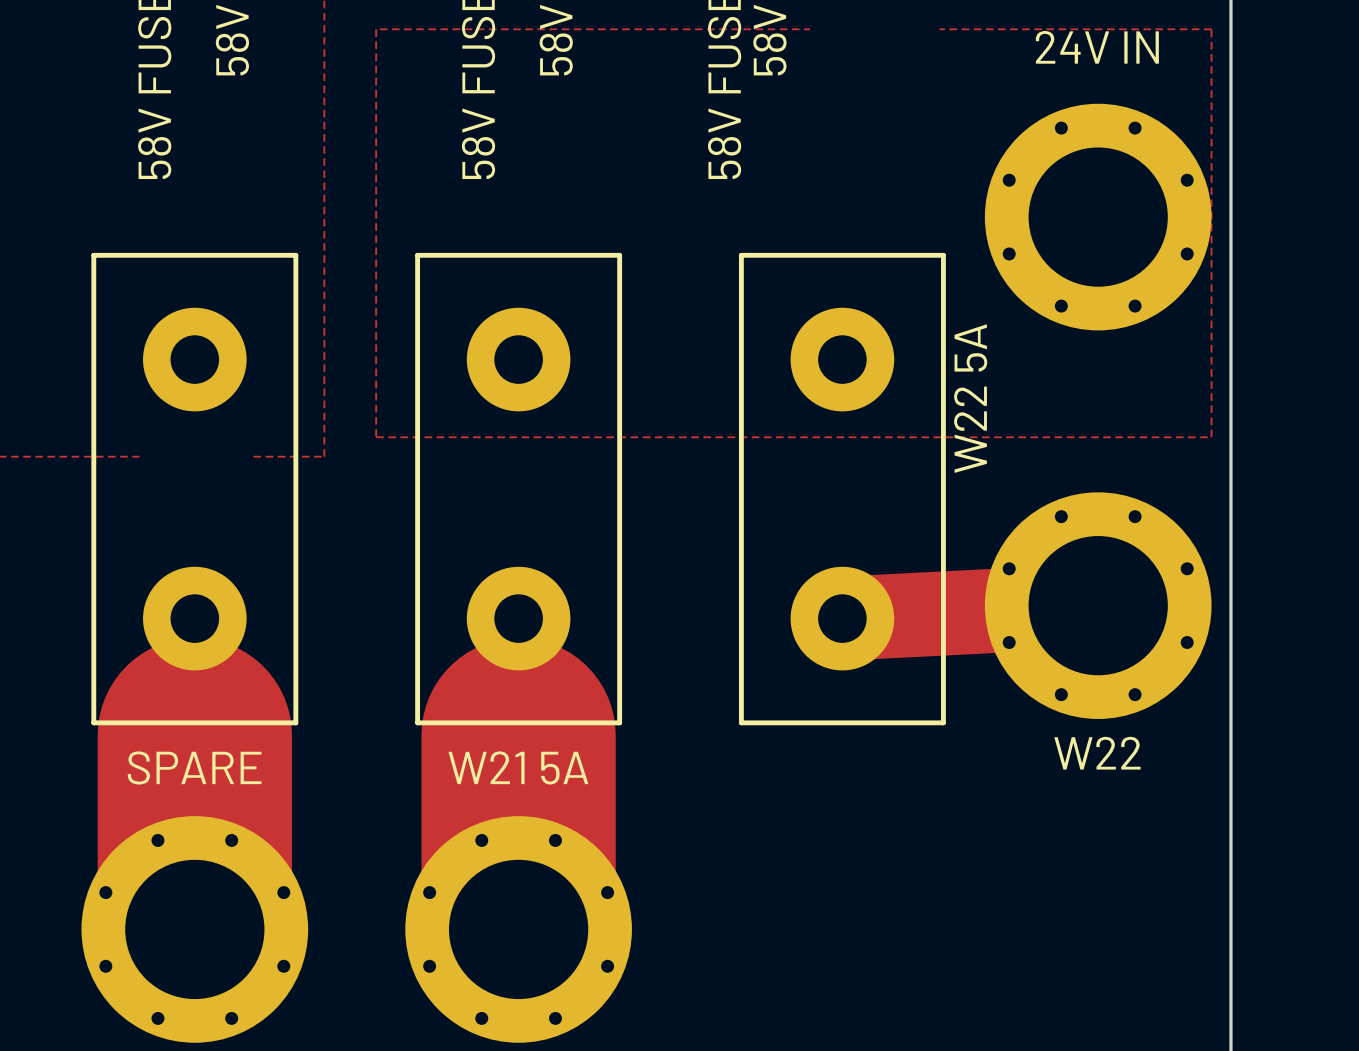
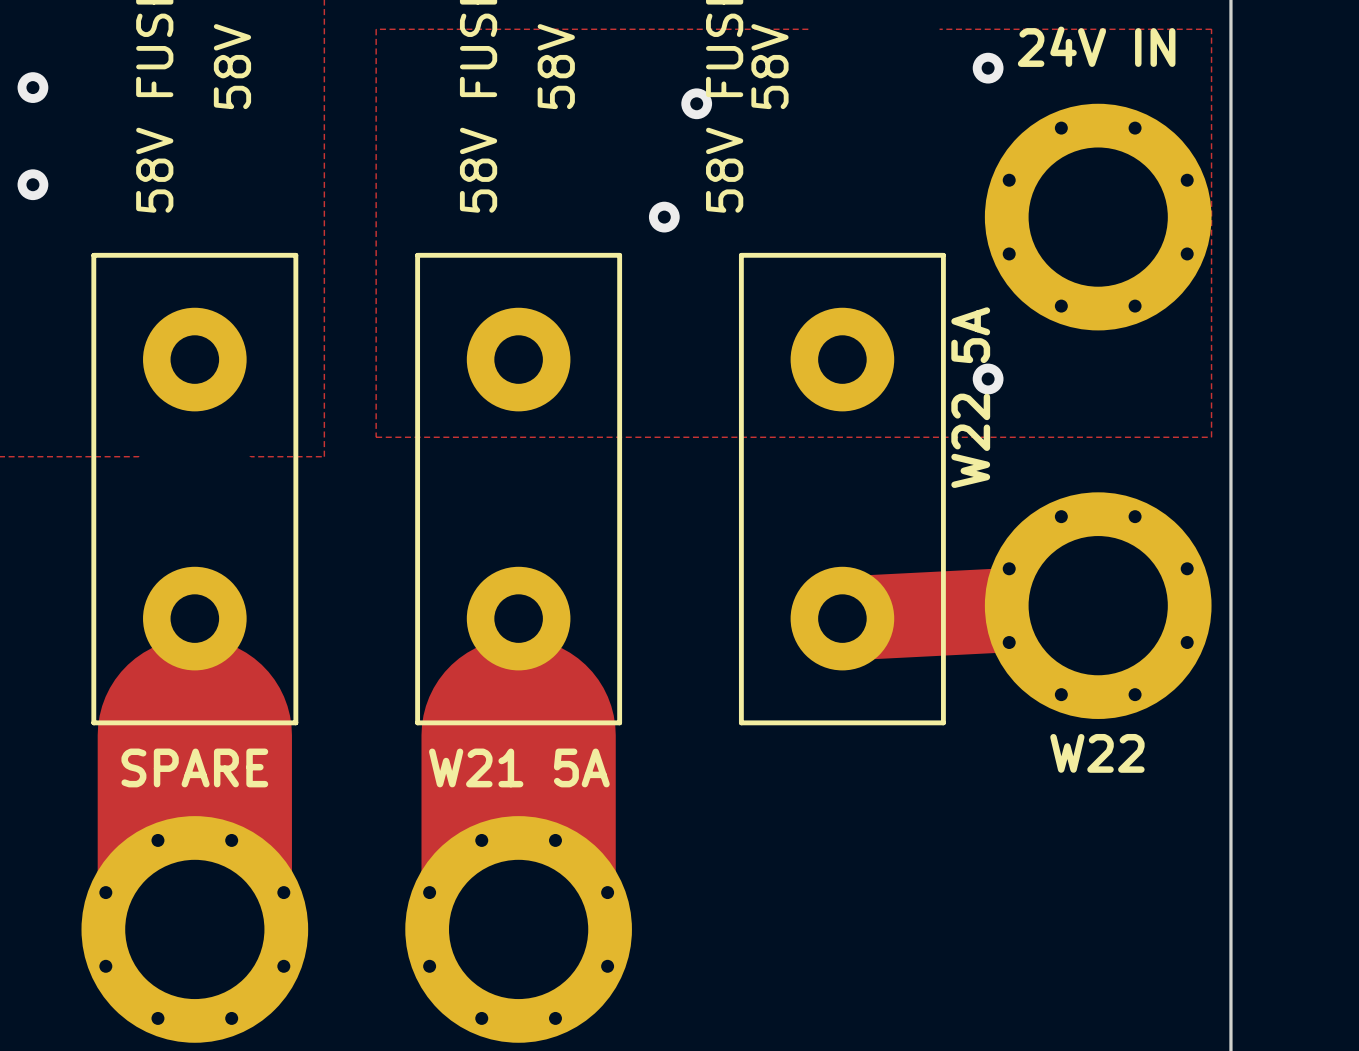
via: none -> (988, 68)
via: none -> (32, 87)
via: none -> (696, 103)
via: none -> (32, 184)
via: none -> (664, 217)
via: none -> (988, 378)

